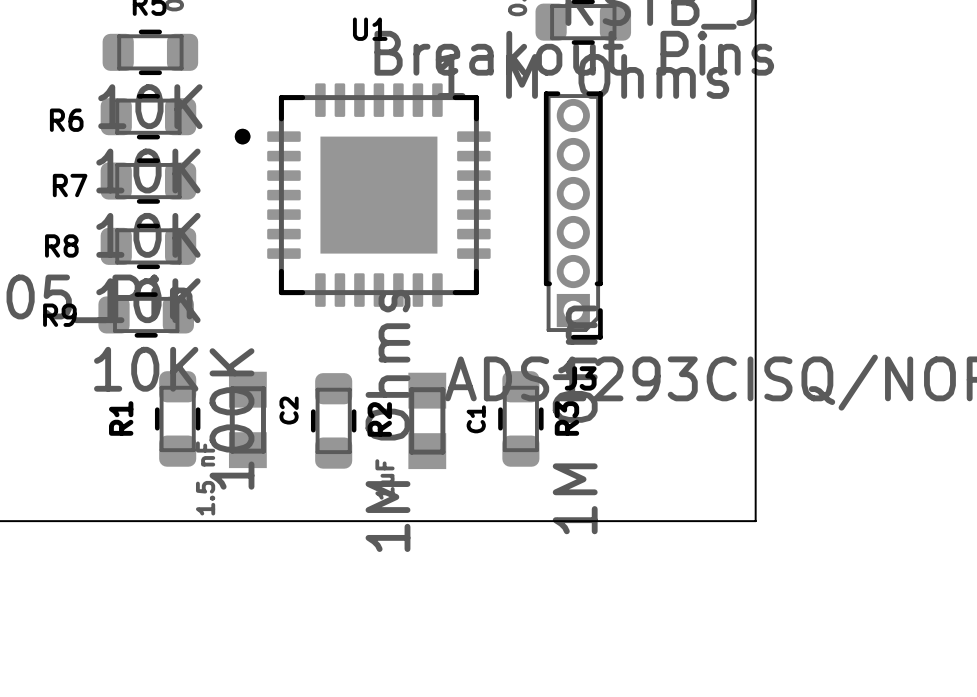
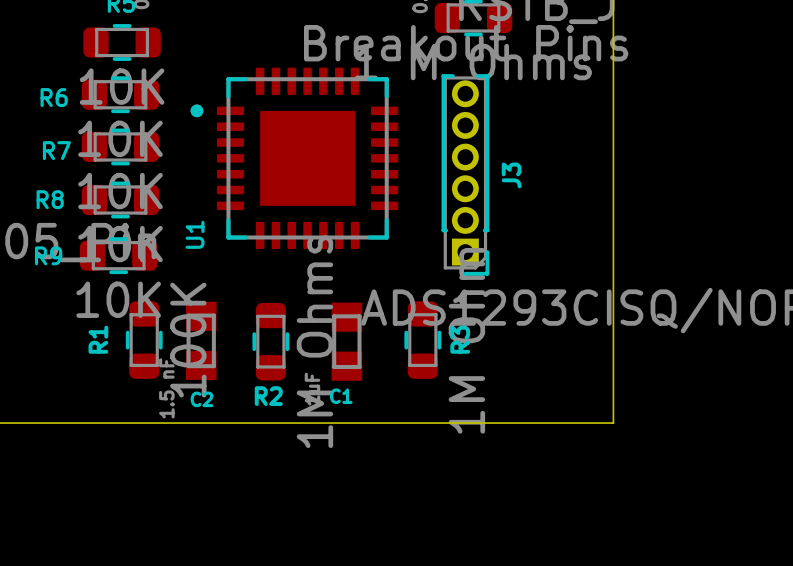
U1 name rotation: 0° (370, 29) -> 90° counterclockwise (195, 234)
U1 name position: U1 (370, 29) -> U1 (195, 234)
J3 name rotation: 0° (580, 378) -> 90° counterclockwise (511, 175)
J3 name position: J3 (580, 378) -> J3 (511, 175)
C2 name rotation: 0° (289, 410) -> 90° clockwise (201, 399)
C2 name position: C2 (289, 410) -> C2 (201, 399)
R2 name rotation: 0° (379, 419) -> 90° clockwise (268, 396)
R2 name position: R2 (379, 419) -> R2 (268, 396)
C1 name rotation: 0° (476, 419) -> 90° clockwise (341, 396)
C1 name position: C1 (476, 419) -> C1 (341, 396)

